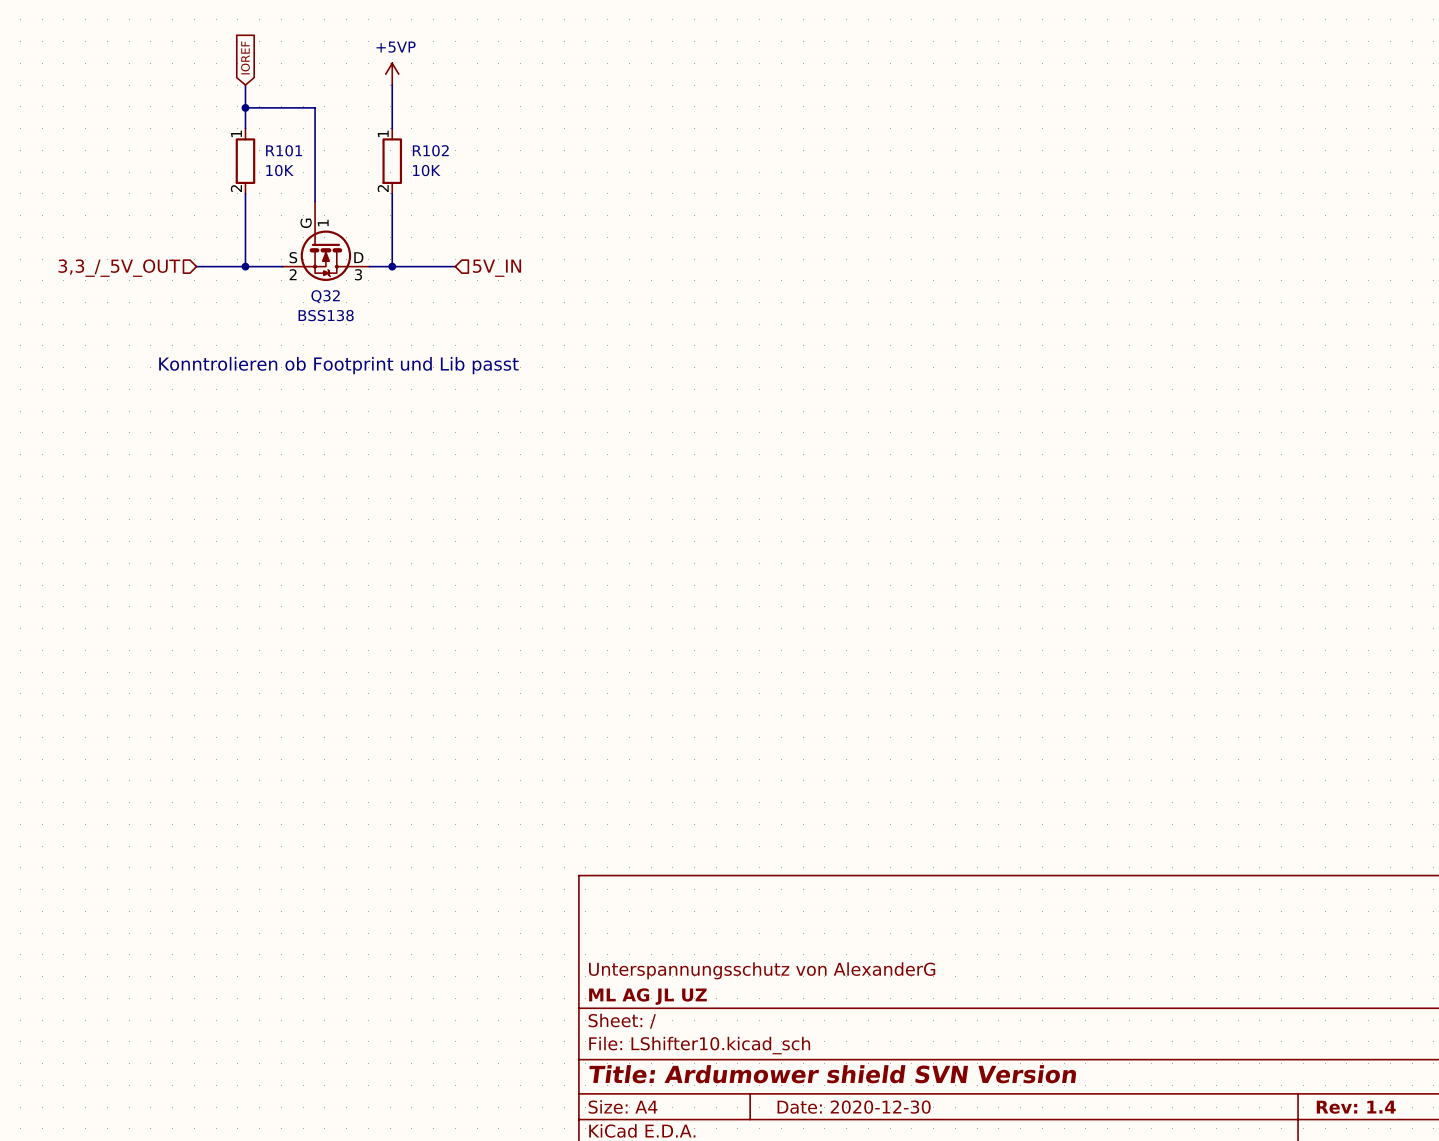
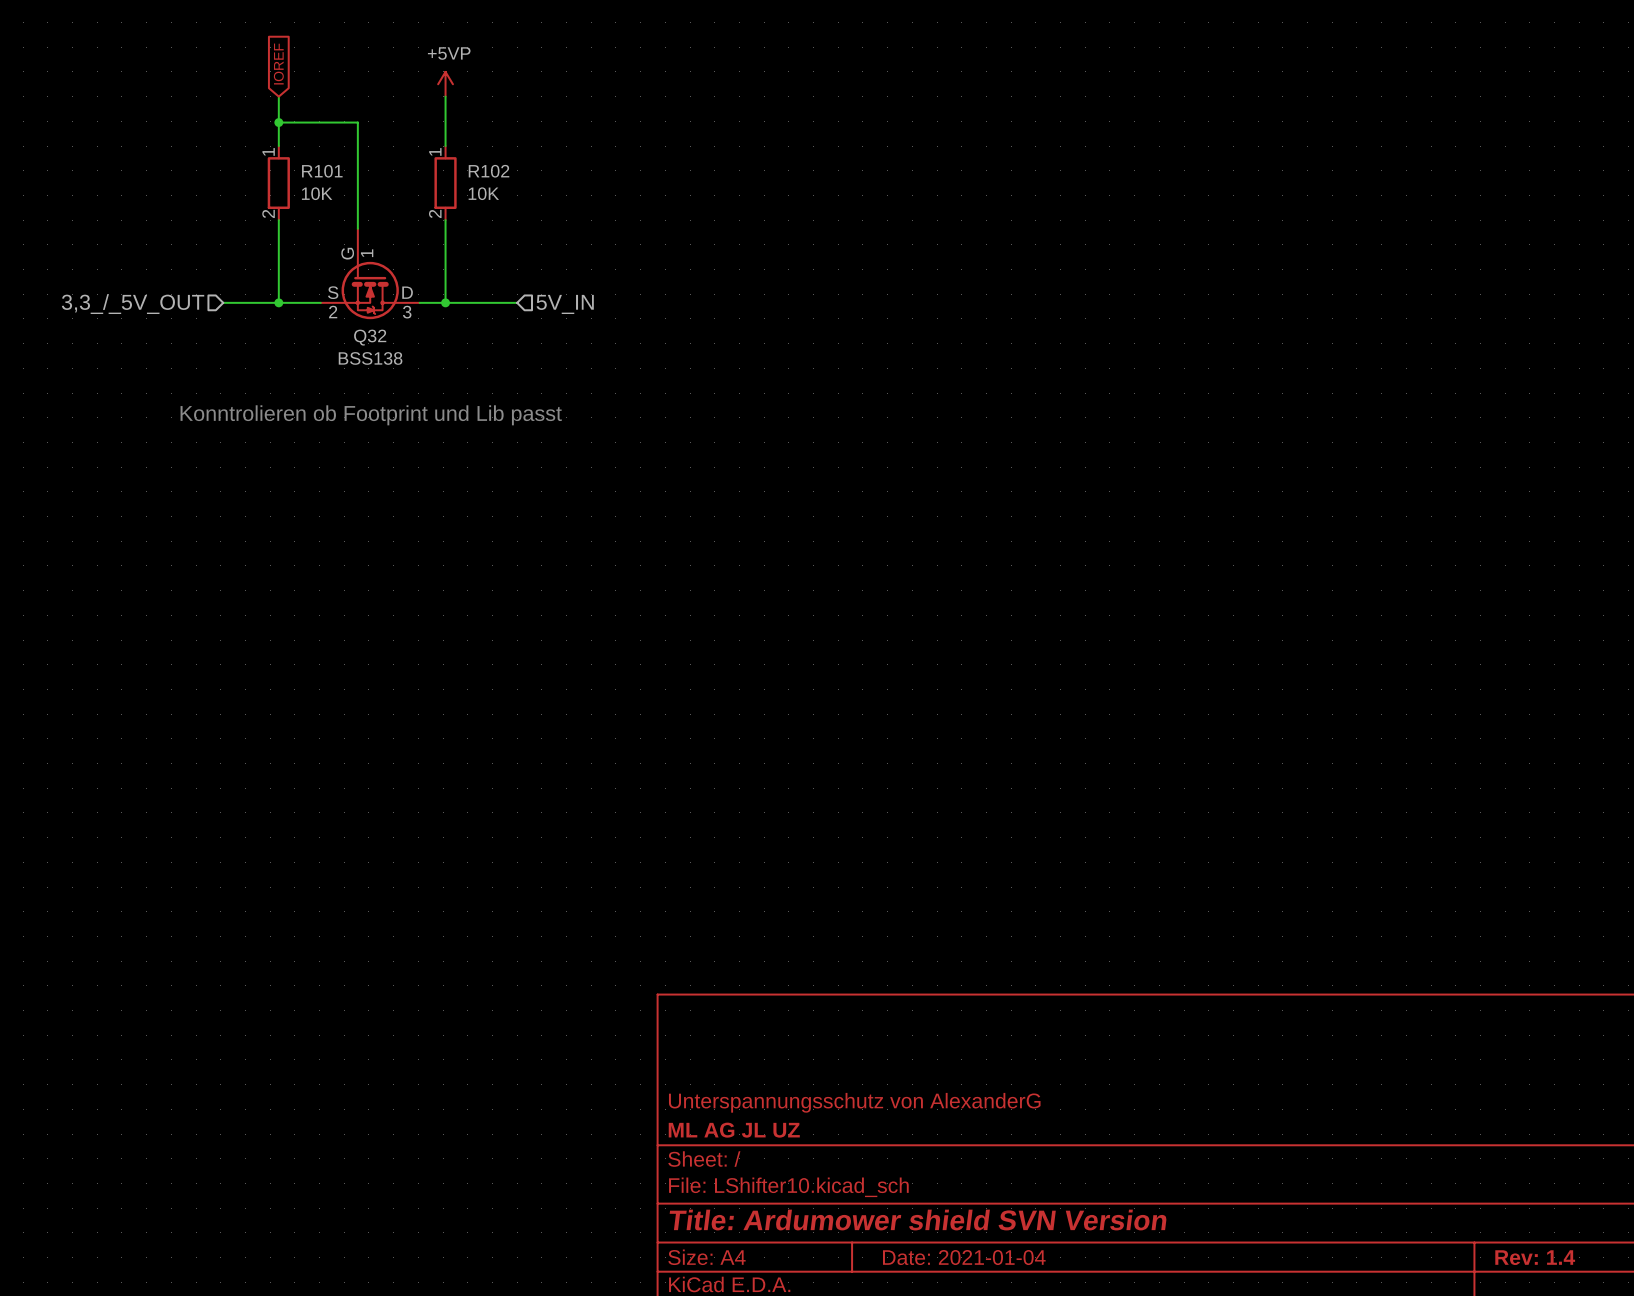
title block: Date: 2020-12-30 (854, 1107) -> Date: 2021-01-04 (964, 1257)

